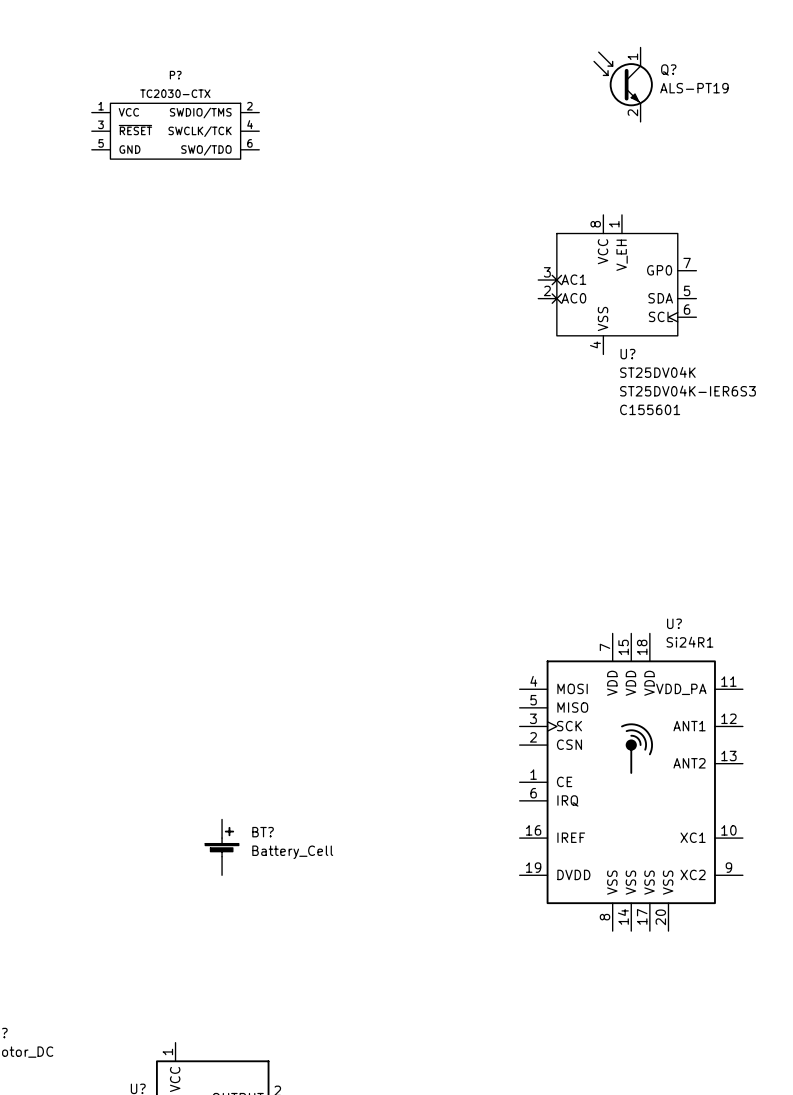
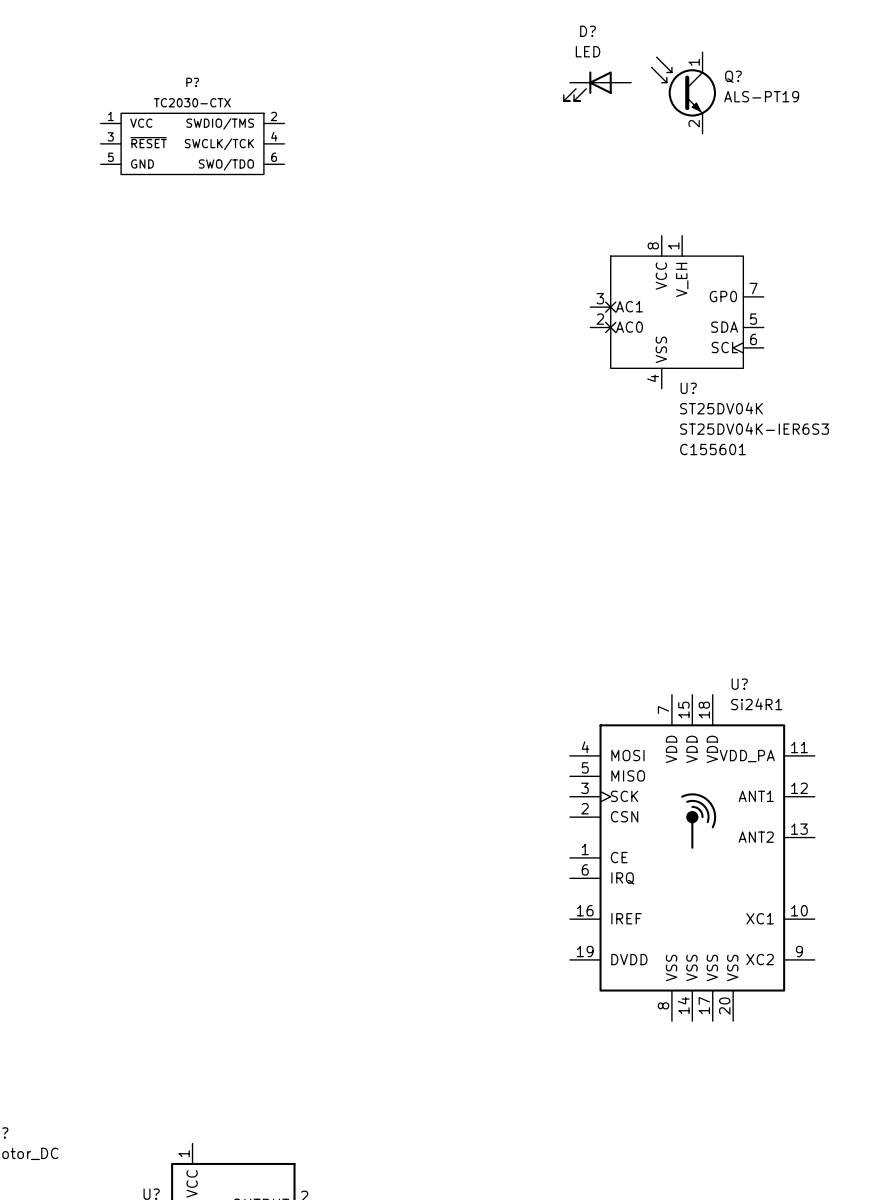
D?: none -> LED (597, 86)
BT?: Battery_Cell (222, 847) -> none

